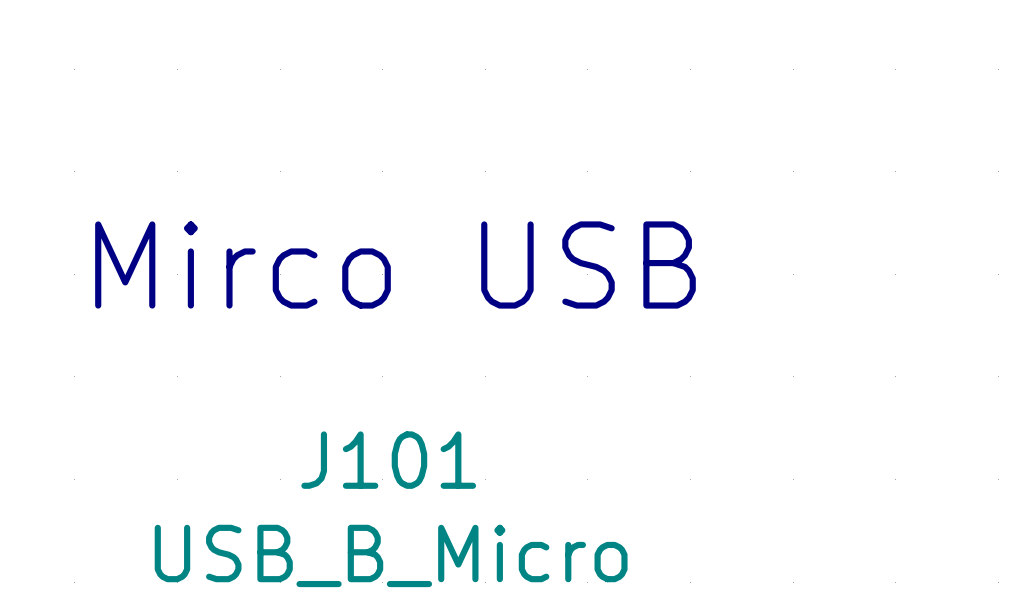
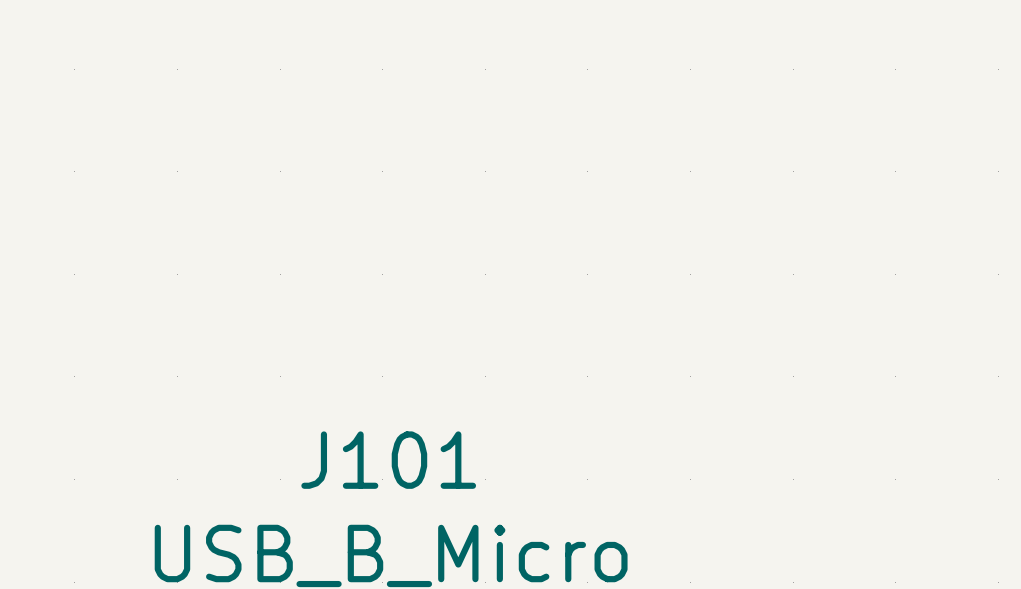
text: Mirco USB (395, 265) -> none

